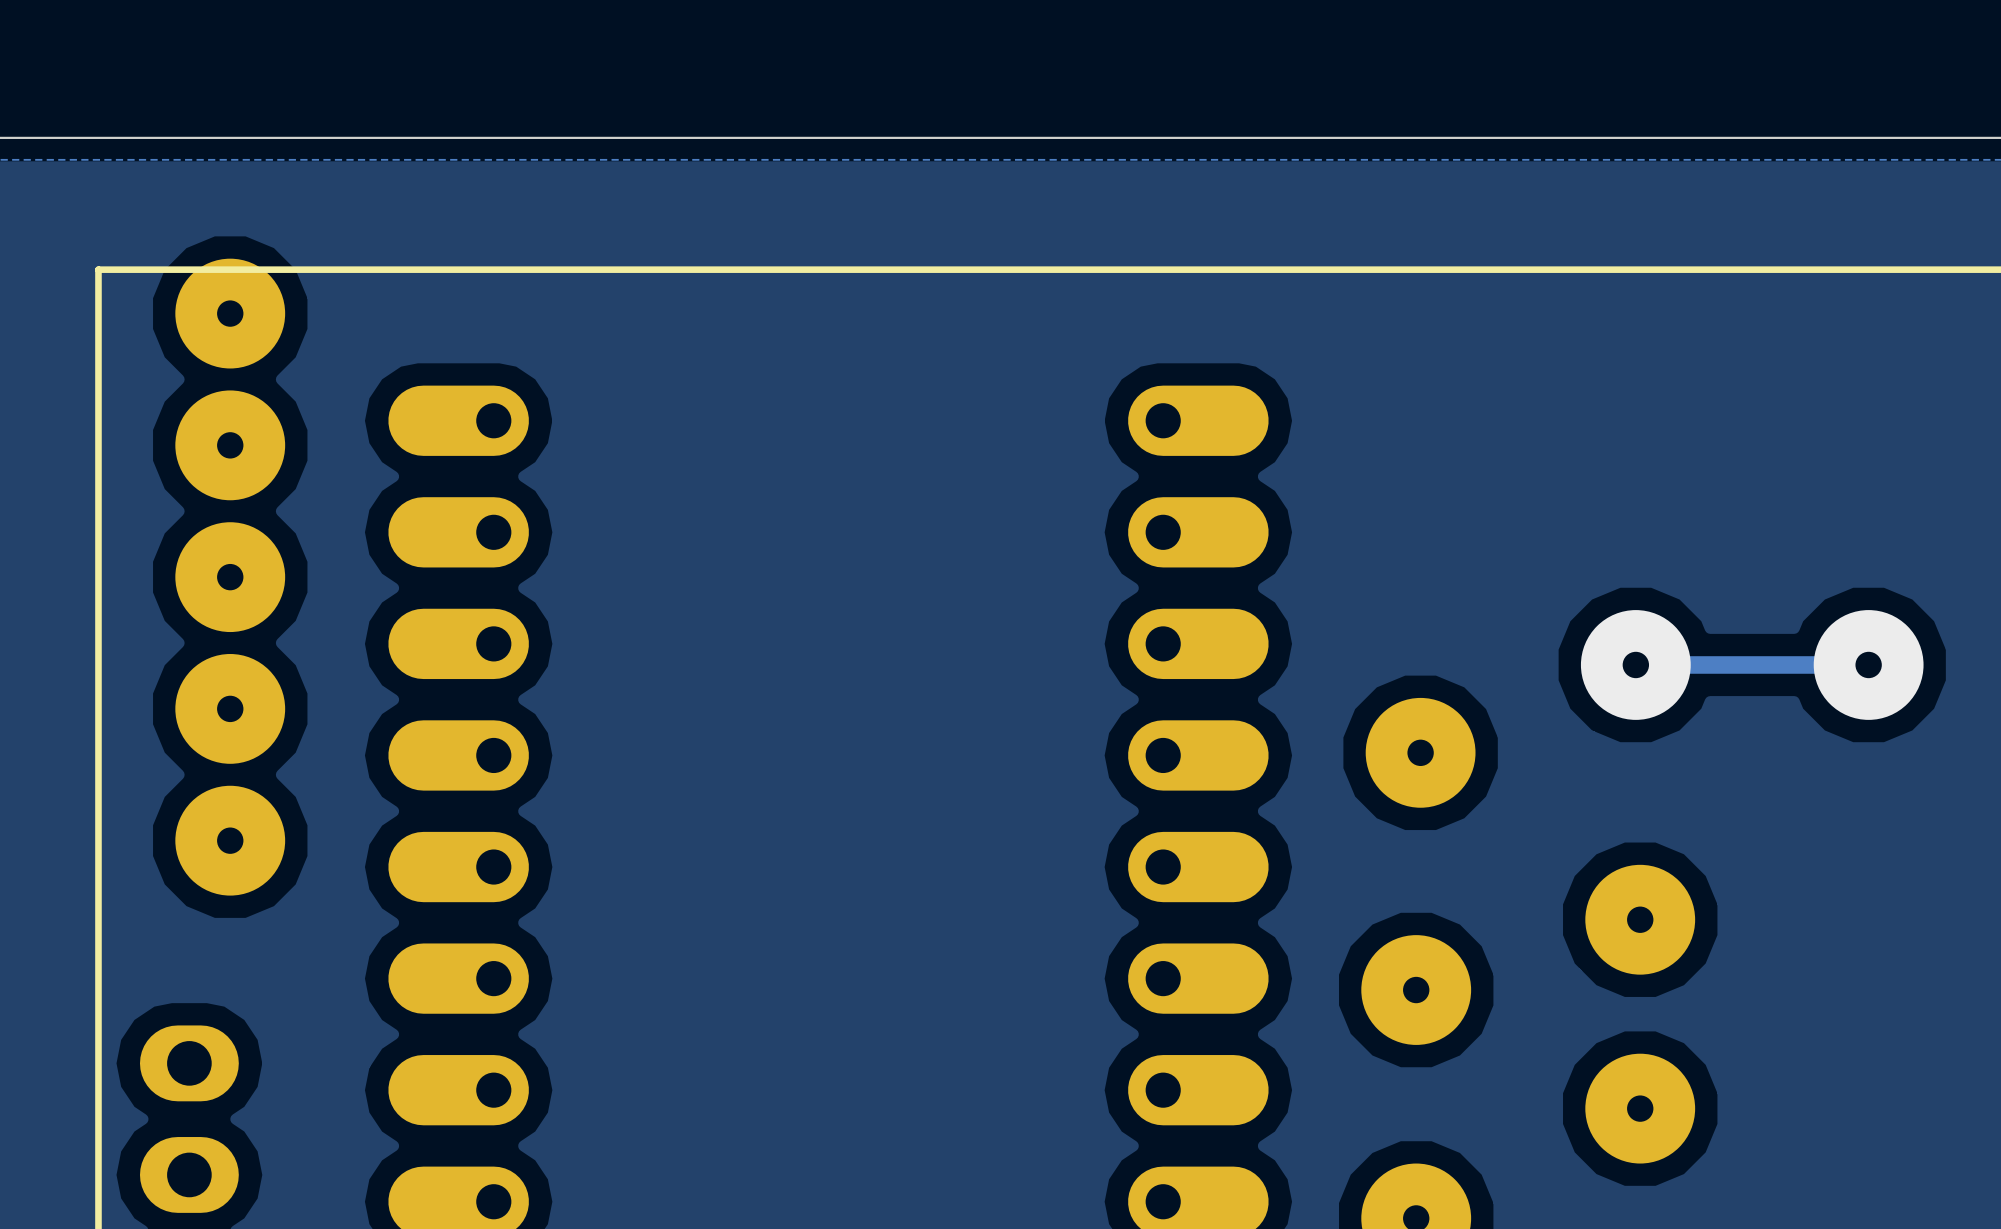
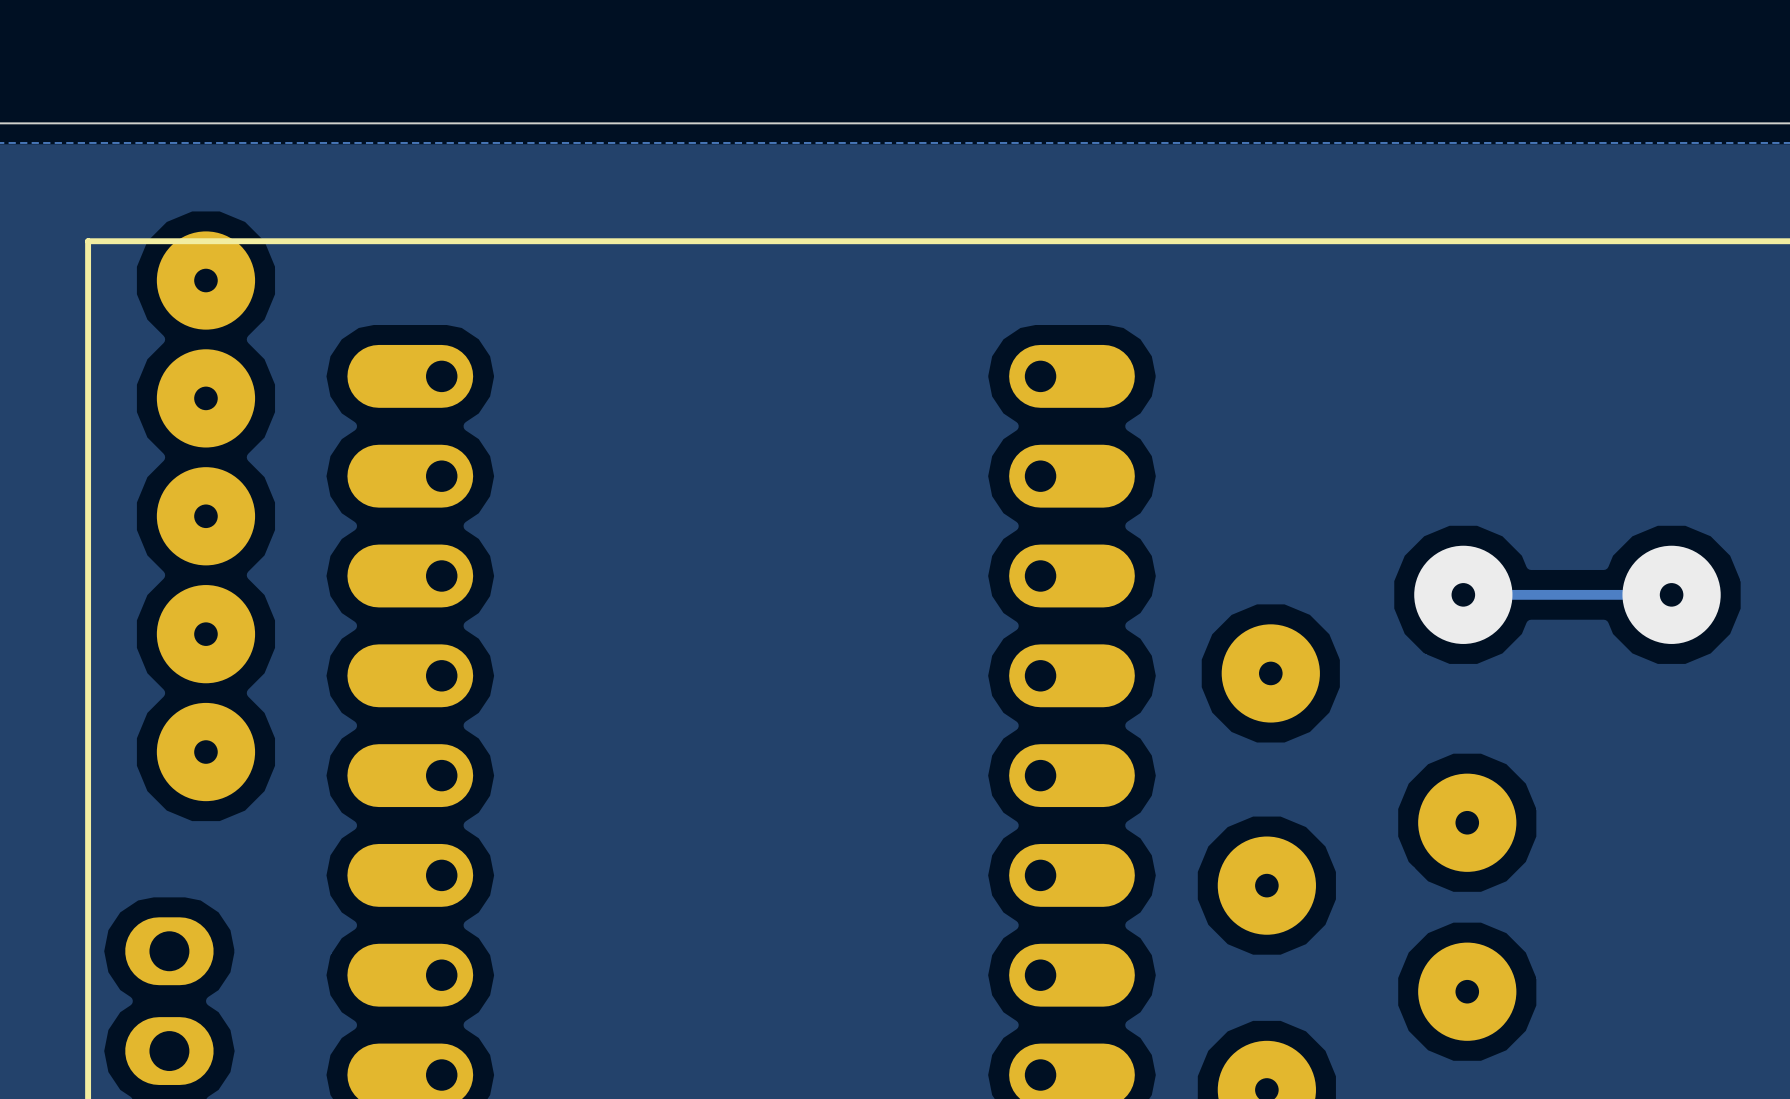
track width: thick (1877, 664) (1635, 664) -> thin (1679, 594) (1463, 594)

